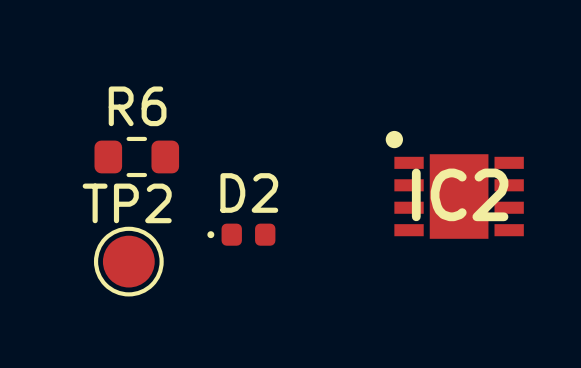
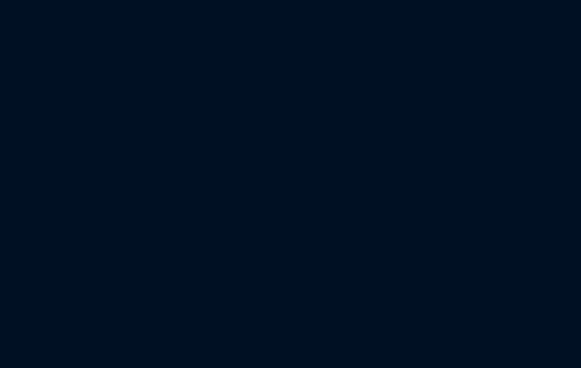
R6: (136, 156) -> none
IC2: (454, 184) -> none
D2: (241, 234) -> none
TP2: (128, 261) -> none

